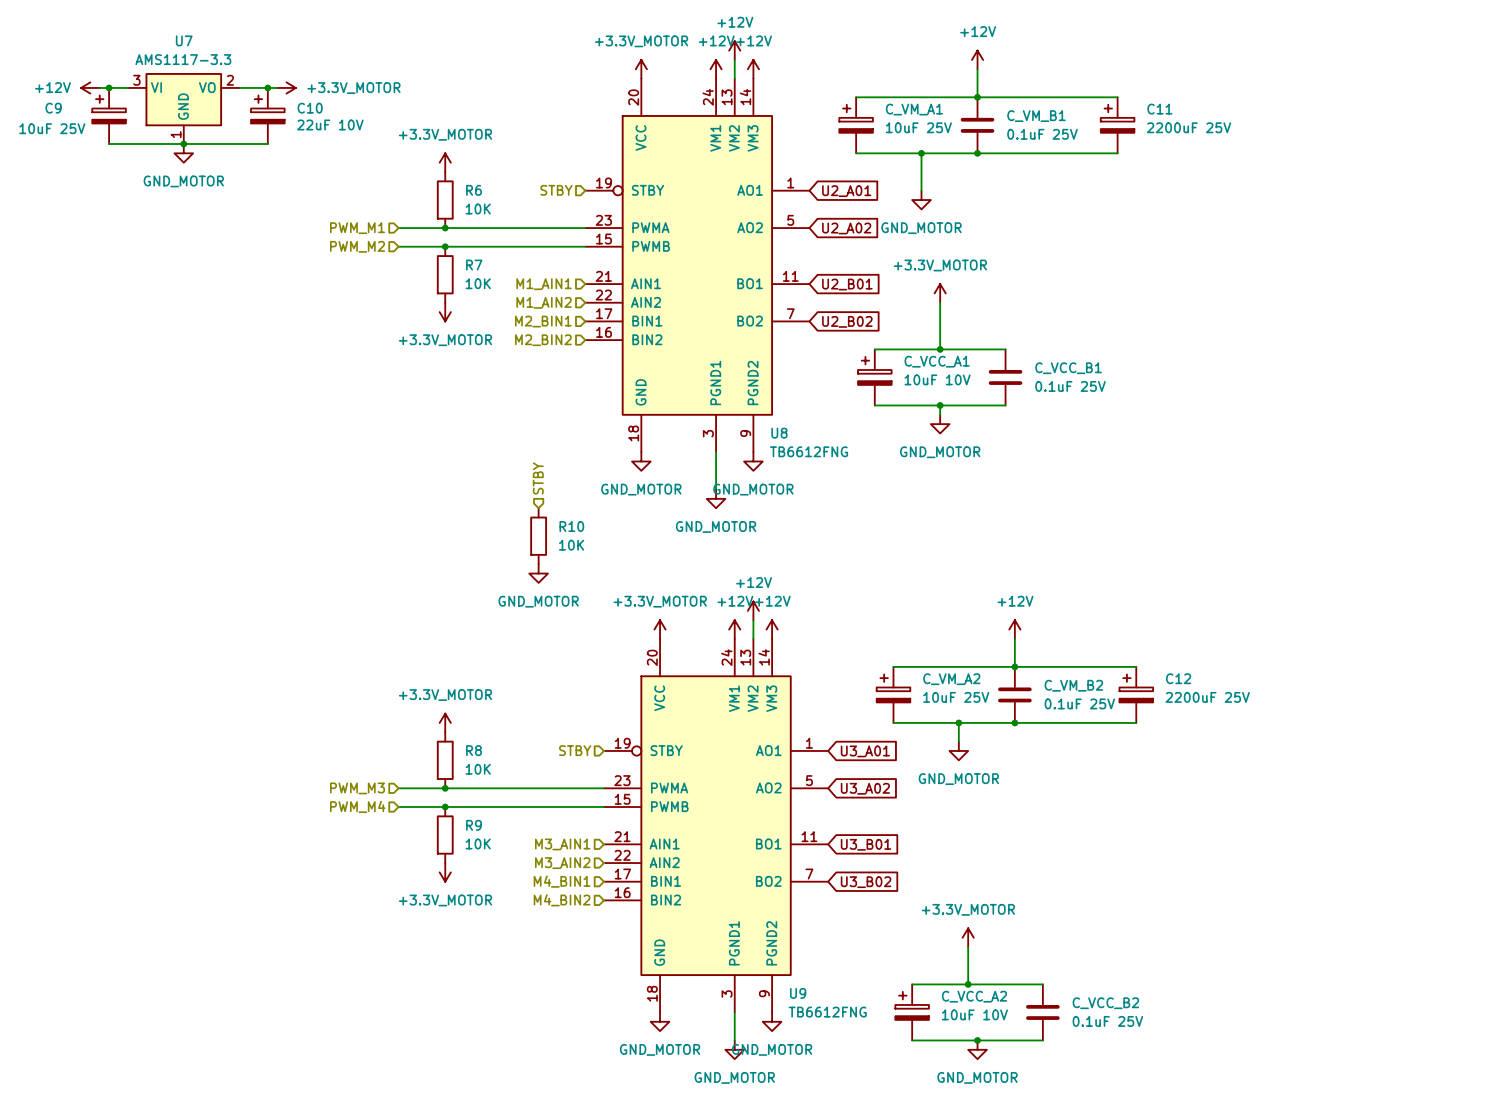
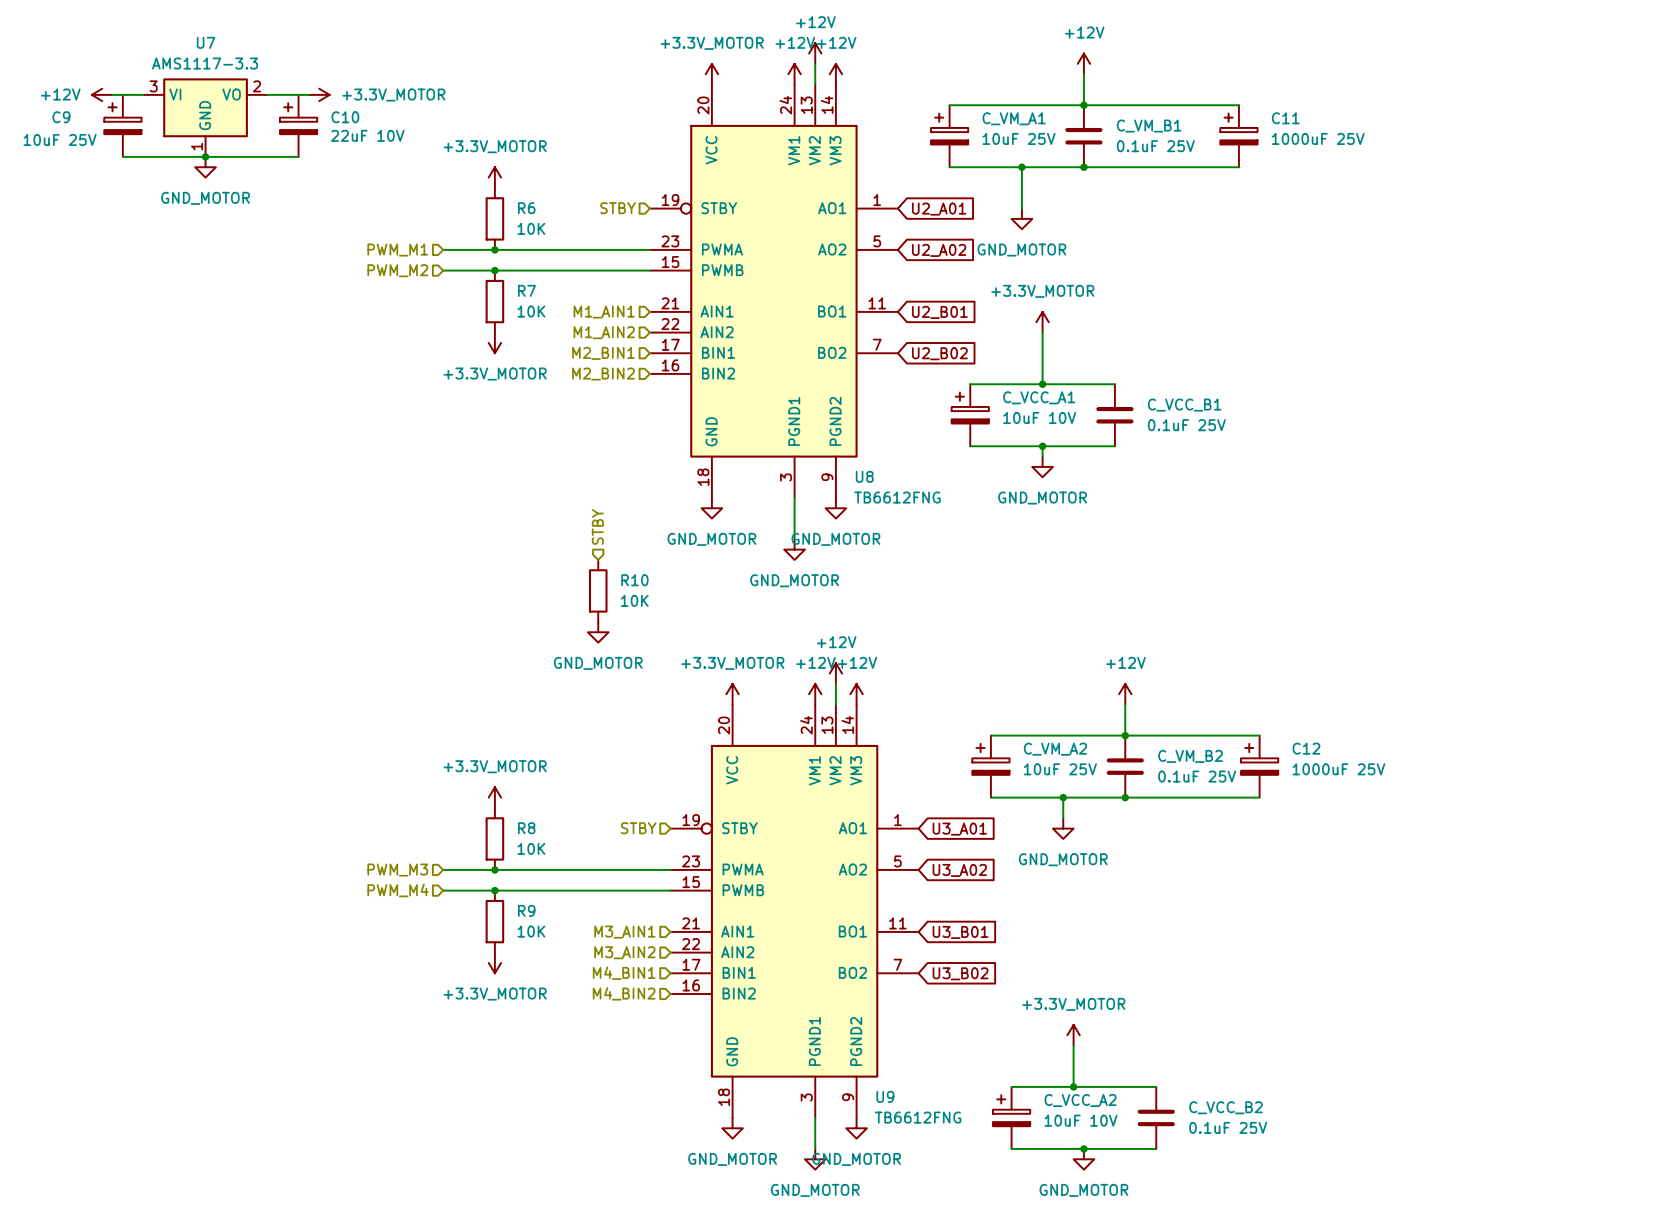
junction: (109, 87) -> none
junction: (267, 87) -> none
C11 value: 2200uF 25V (1189, 127) -> 1000uF 25V (1318, 138)
C12 value: 2200uF 25V (1207, 697) -> 1000uF 25V (1338, 769)

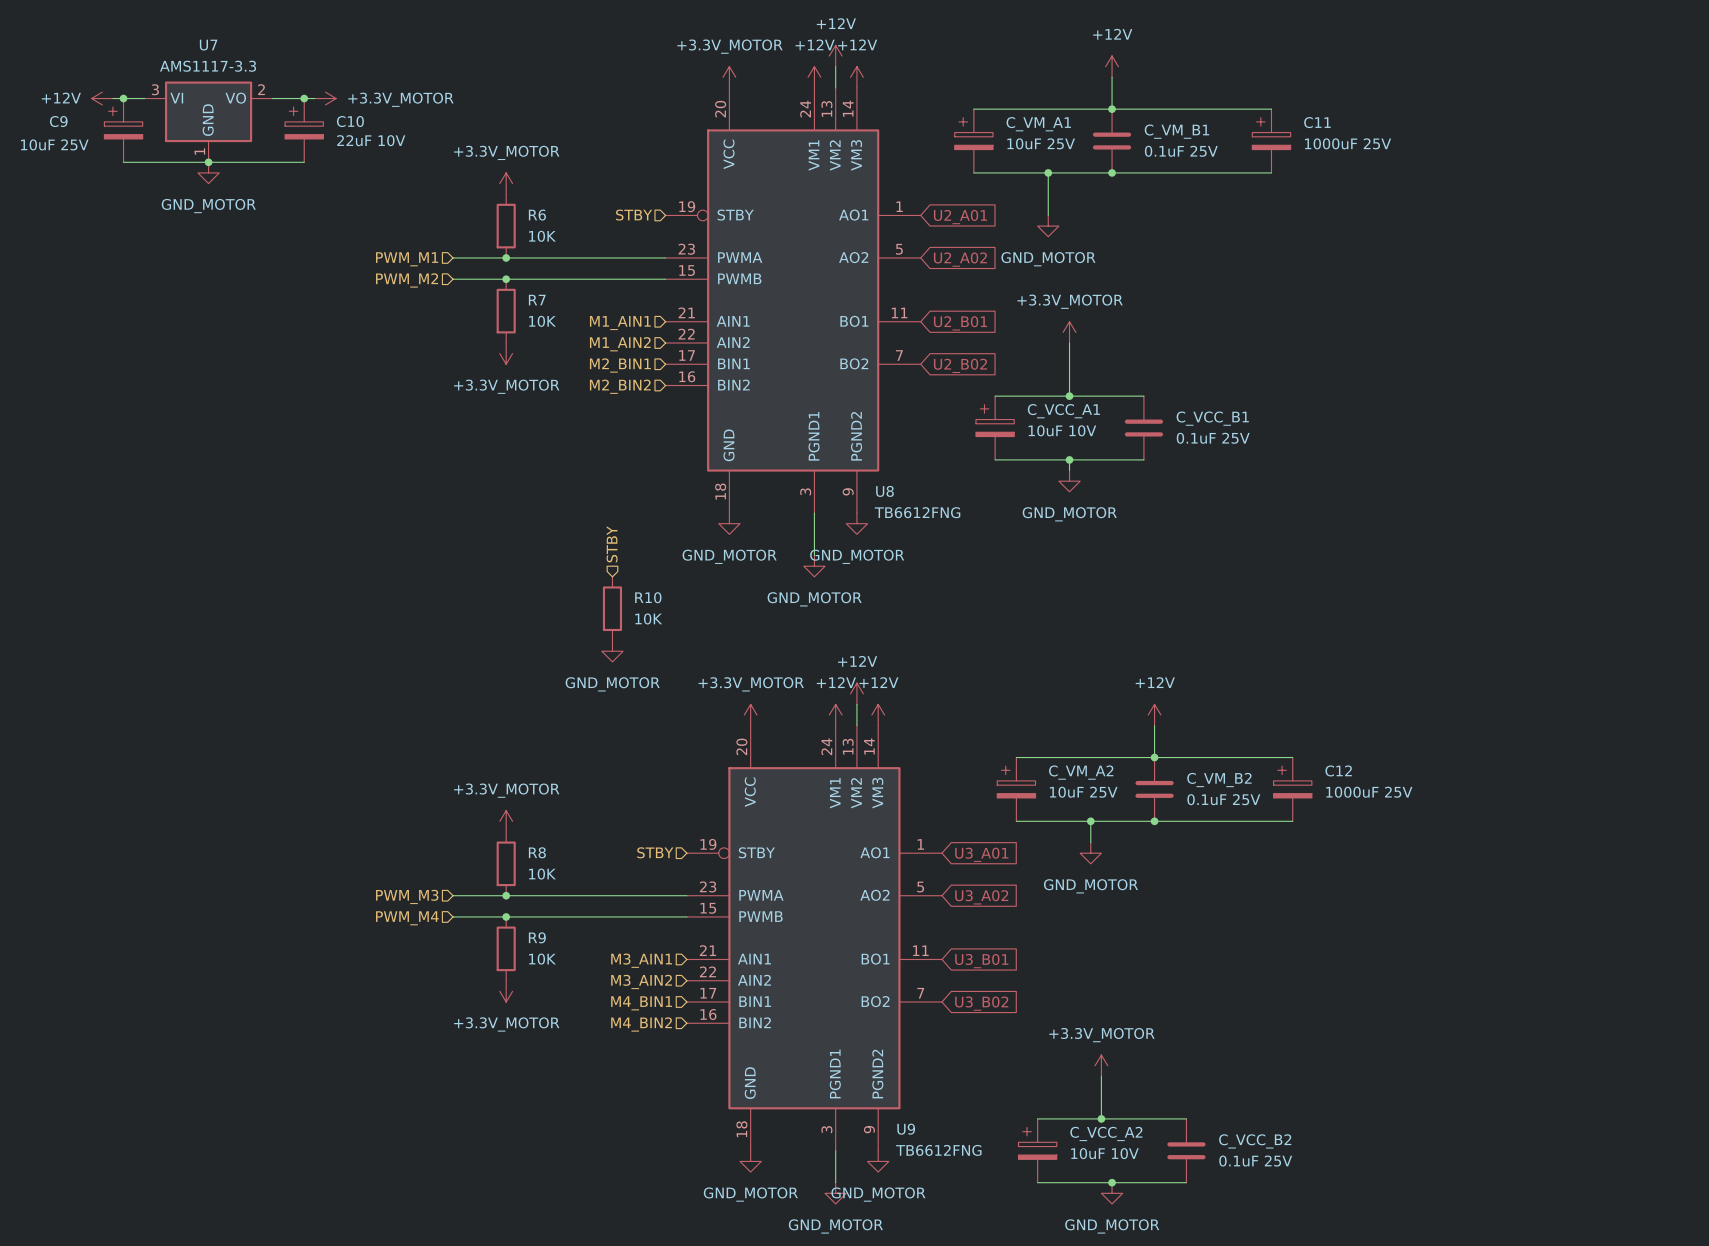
junction: none -> (123, 98)
junction: none -> (304, 98)

